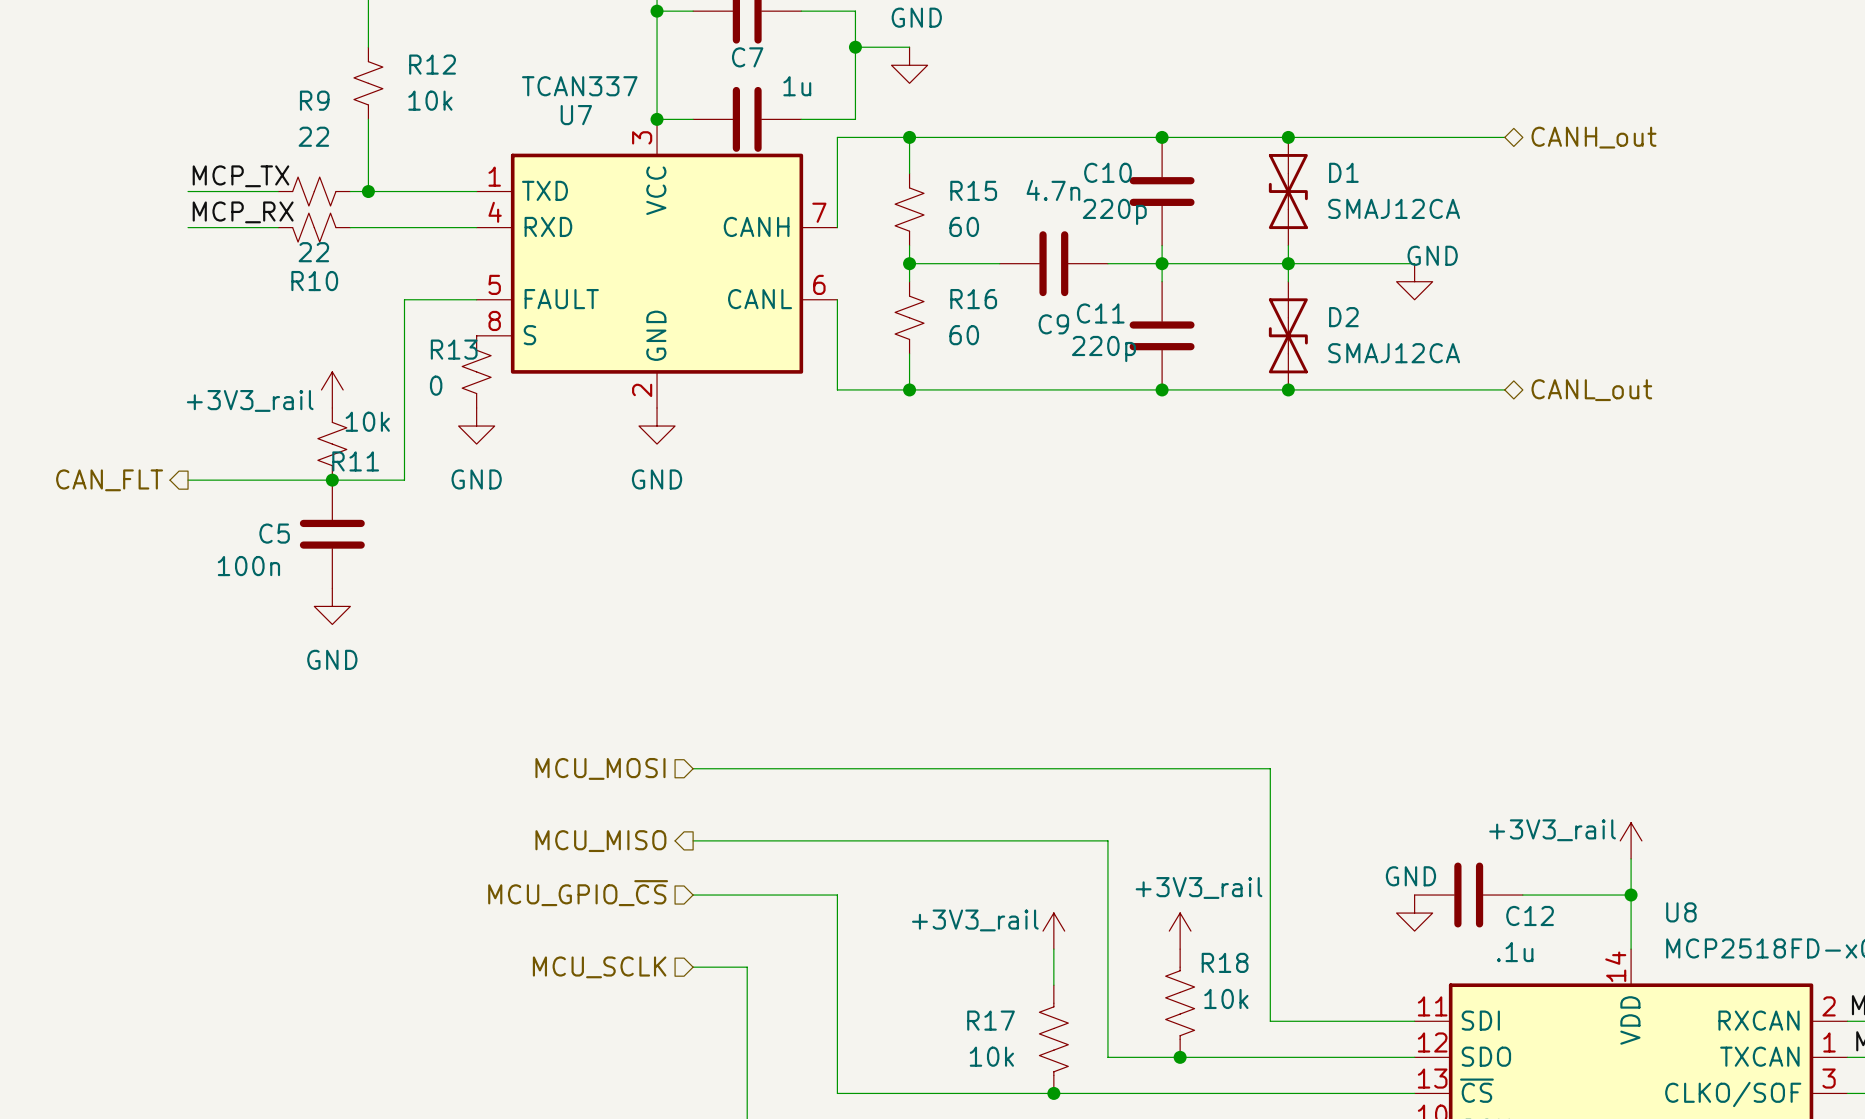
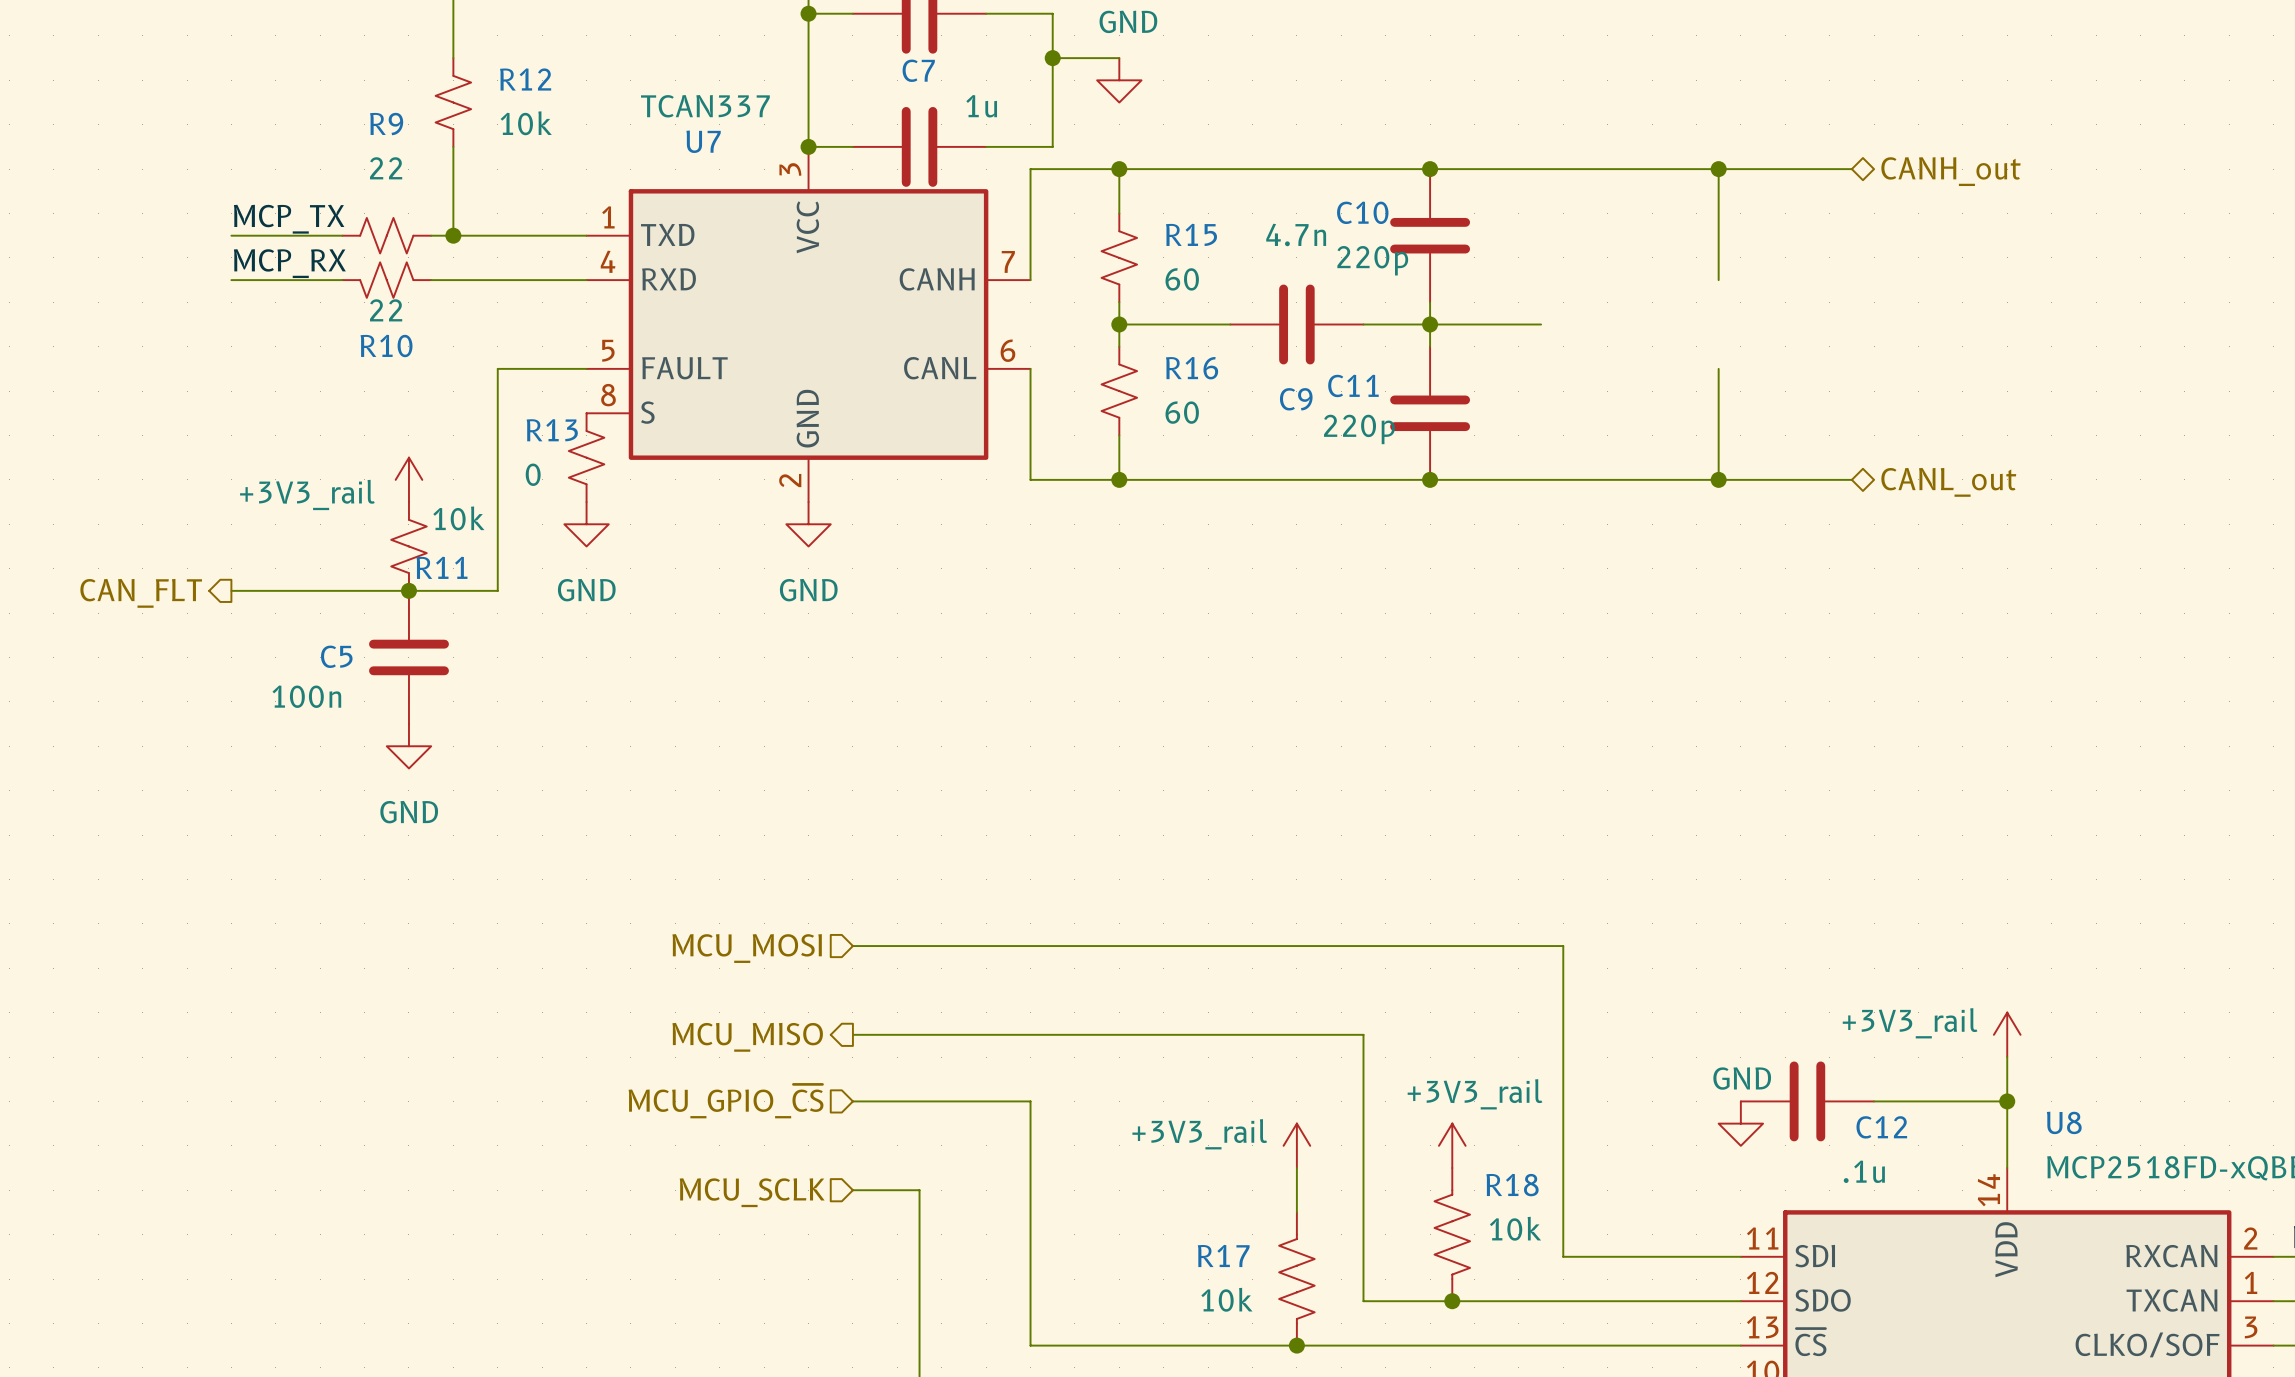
junction: (1288, 137) -> none
wire: none -> (1718, 169) (1718, 280)
junction: none -> (1718, 169)
D1: SMAJ12CA (1288, 191) -> none
wire: (1288, 245) (1288, 281) -> none
wire: (1252, 263) (1414, 263) -> none
junction: (1288, 263) -> none
power symbol: GND (1414, 281) -> none
wire: none -> (1718, 368) (1718, 479)
D2: SMAJ12CA (1288, 335) -> none
junction: (1288, 389) -> none
junction: none -> (1718, 479)

